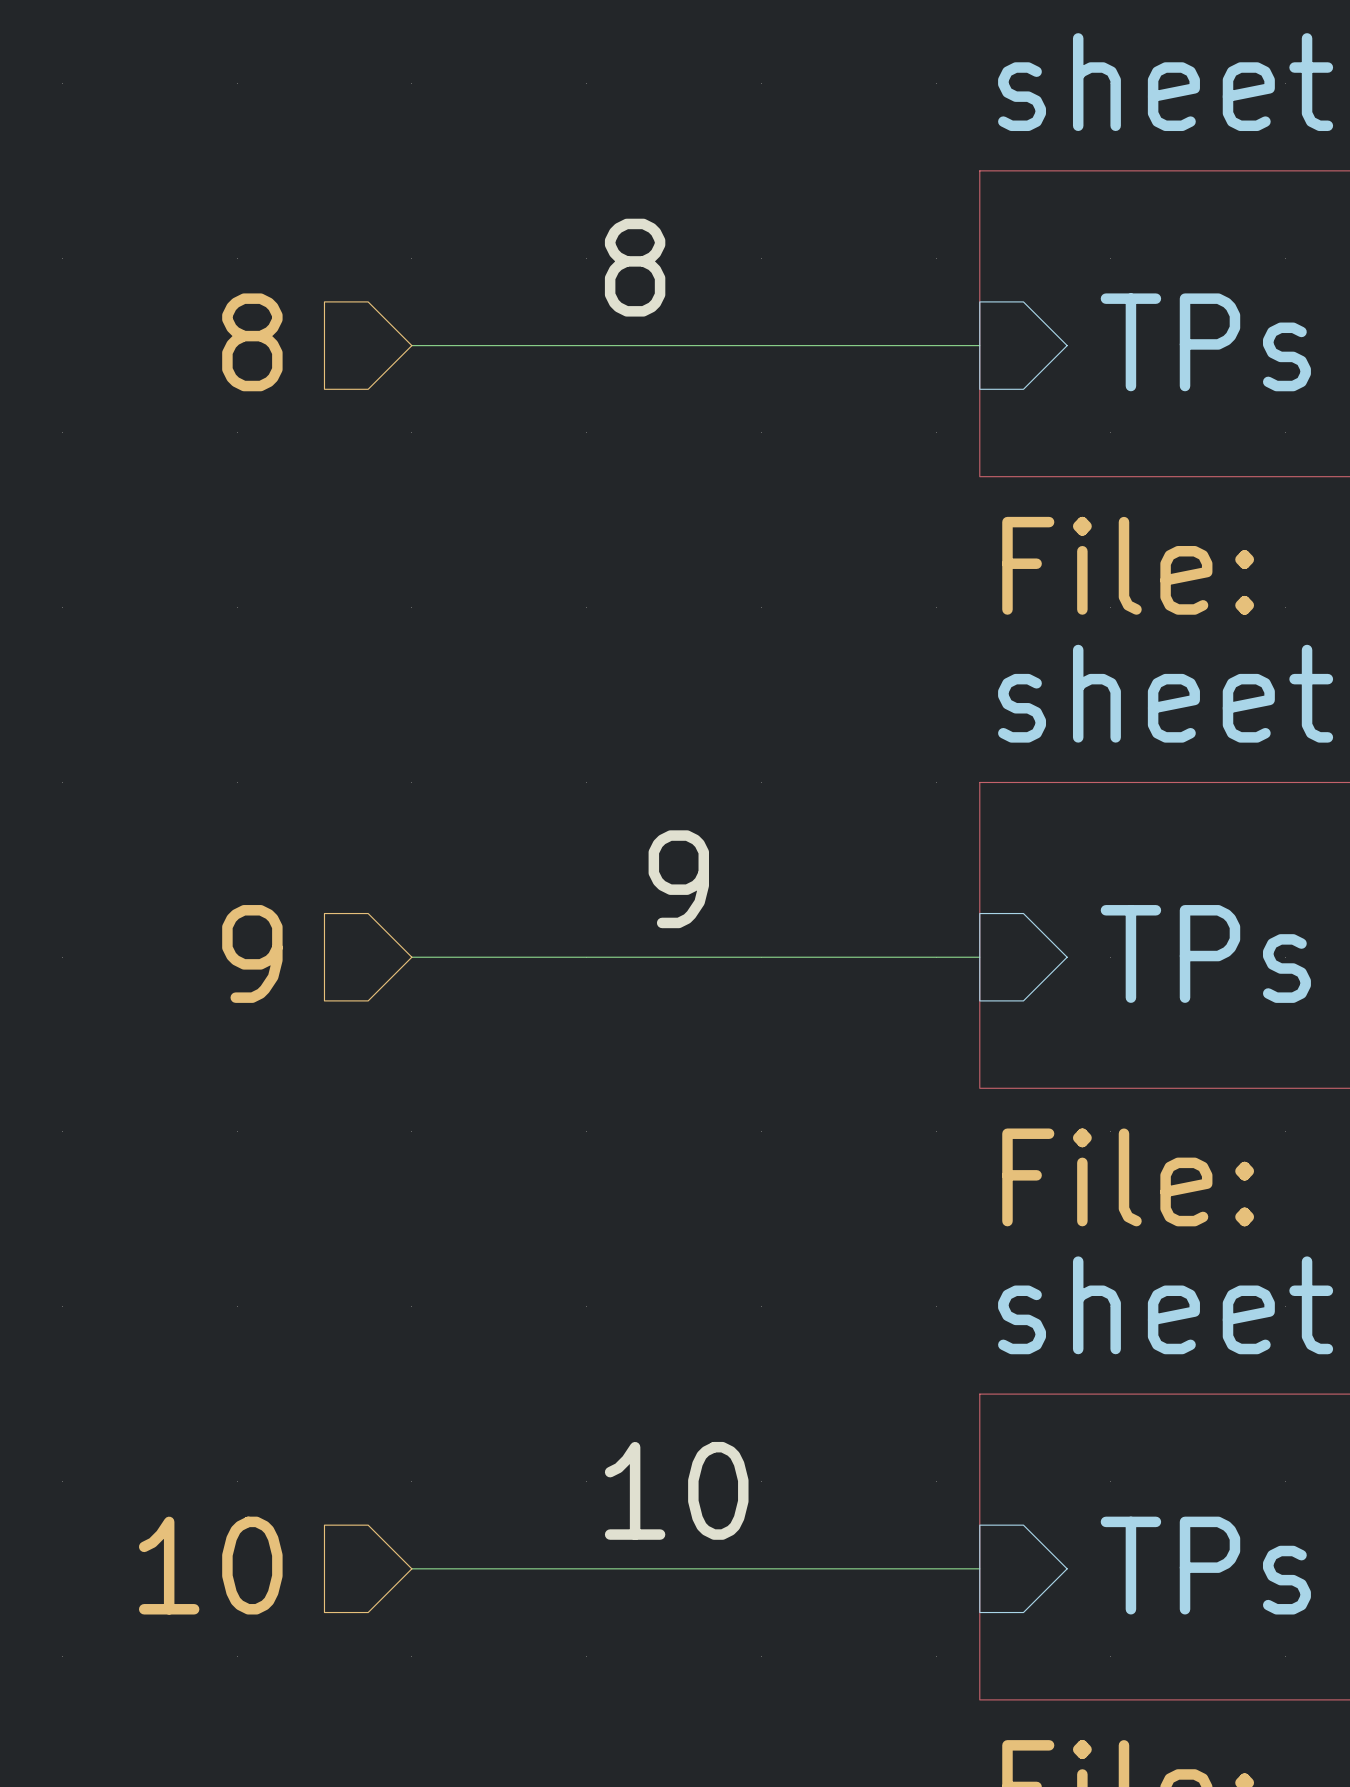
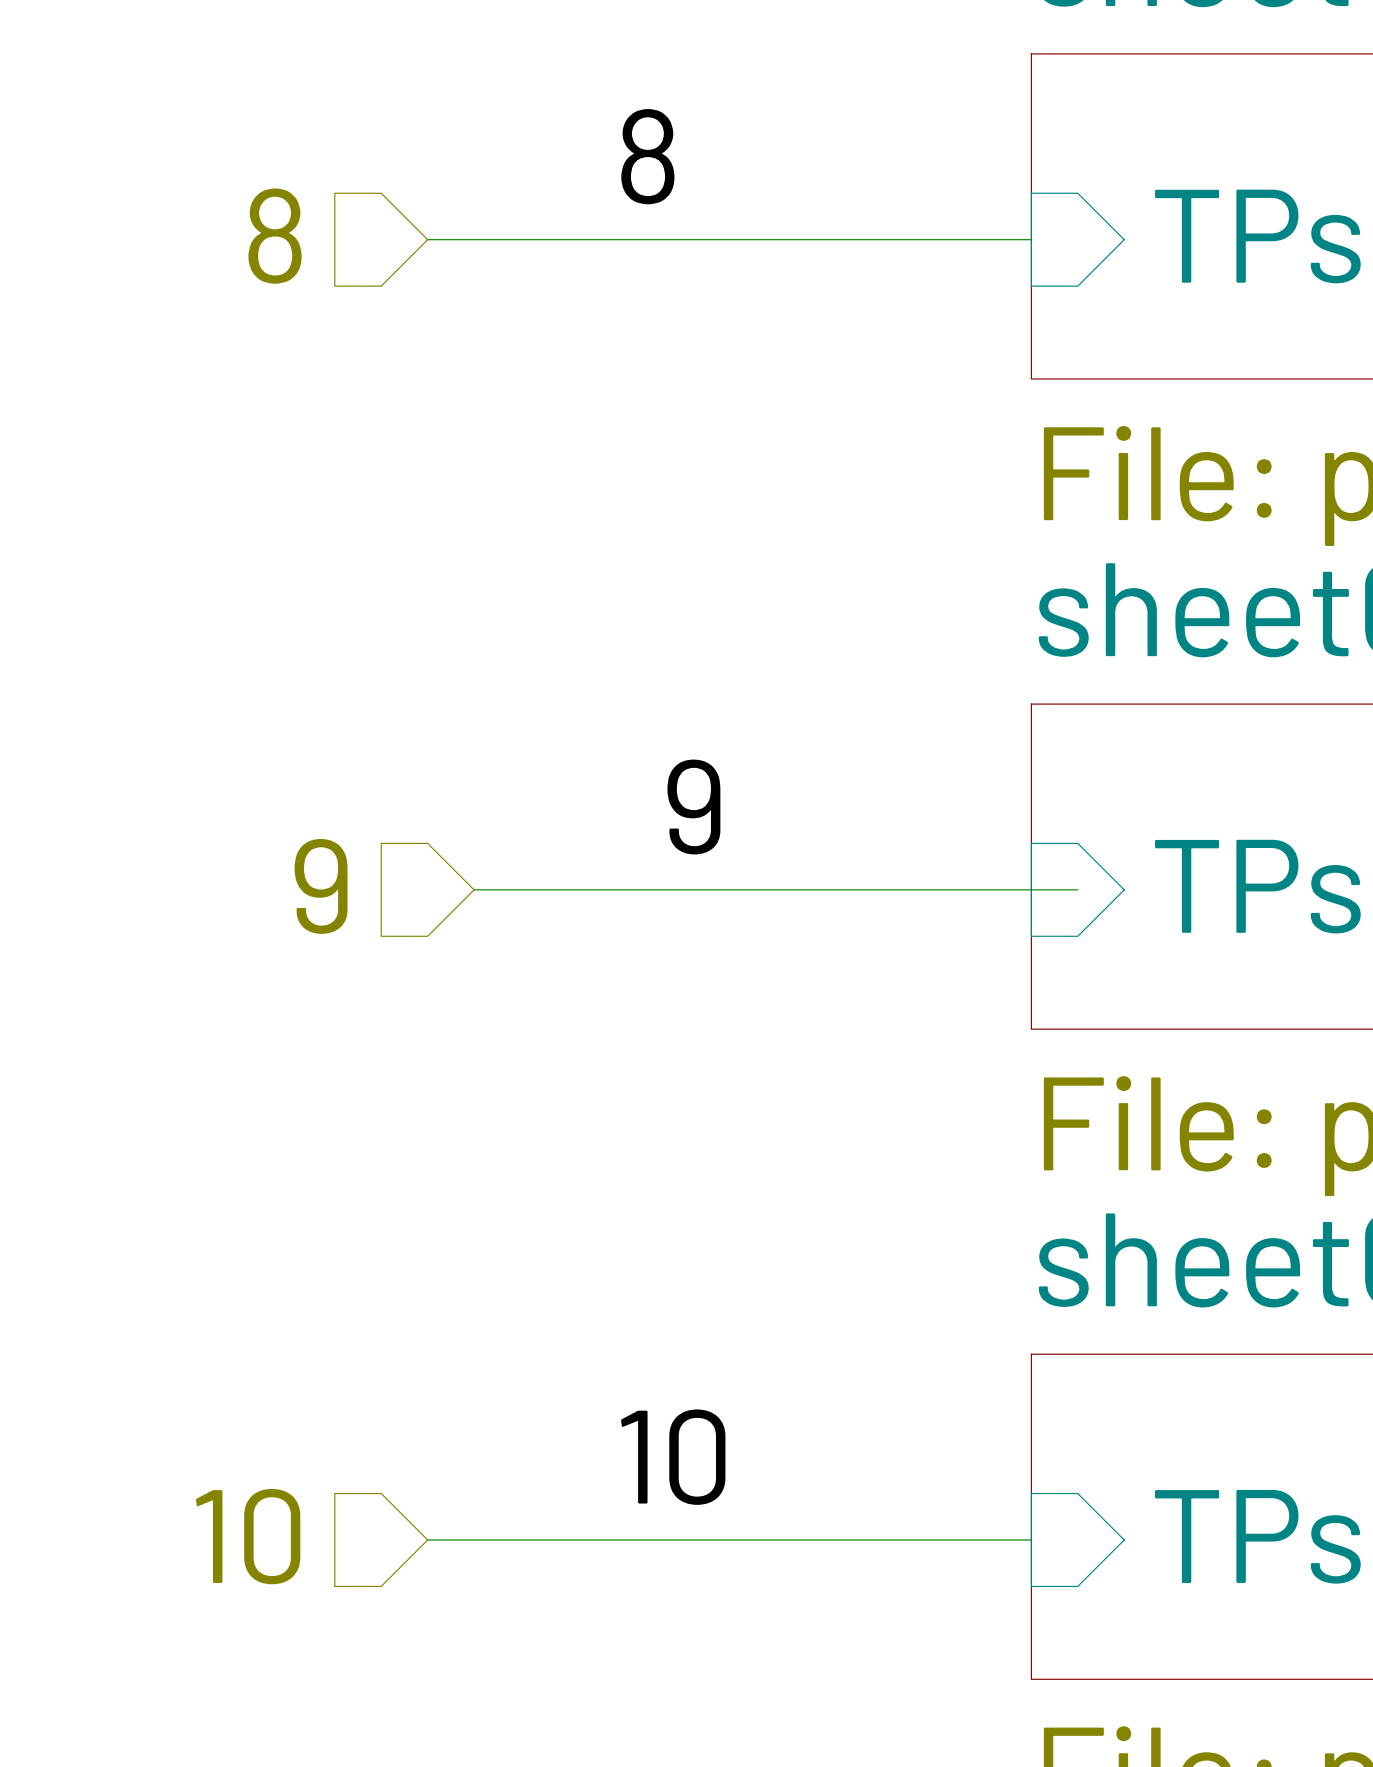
hierarchical label position: 9 (252, 953) -> 9 (321, 886)
wire: (411, 957) (455, 957) -> (1031, 889) (1077, 889)

